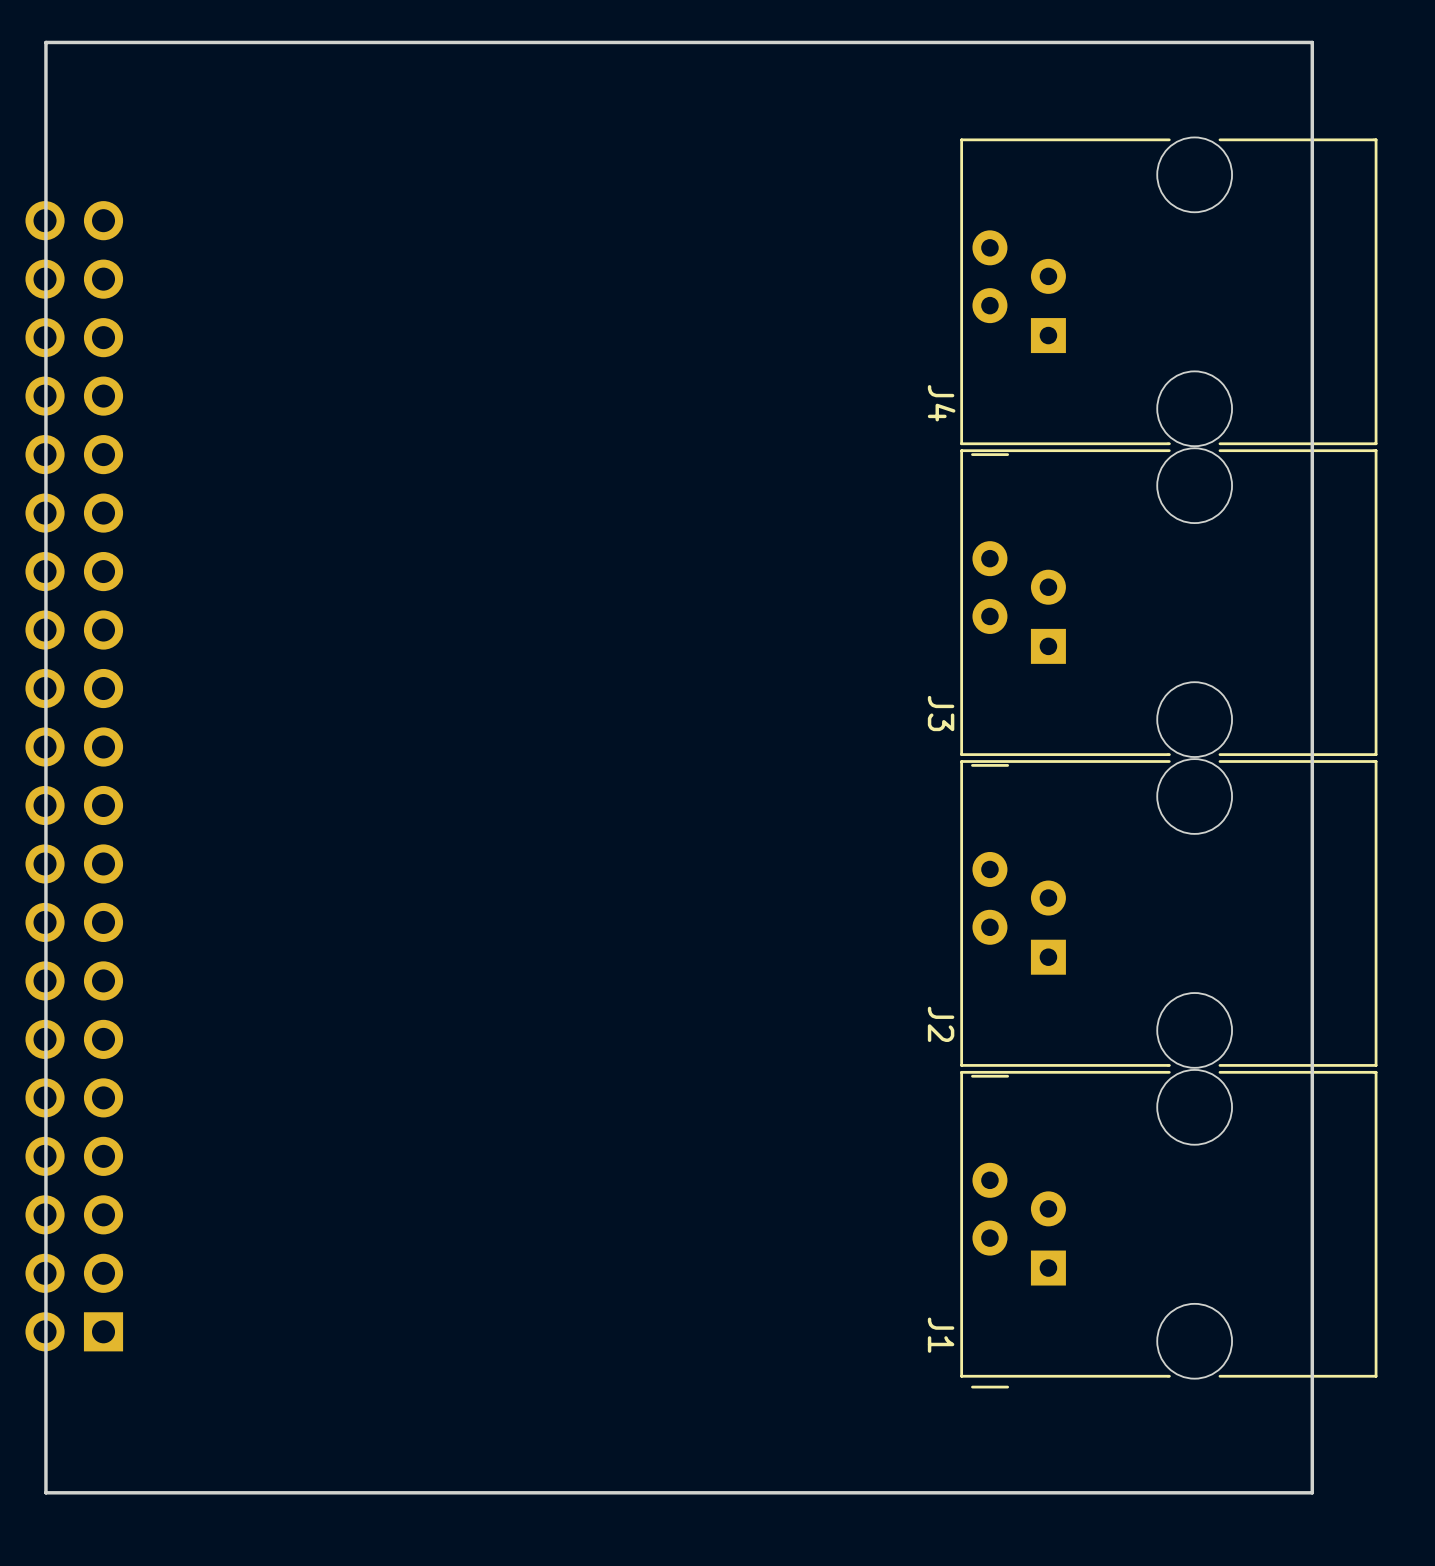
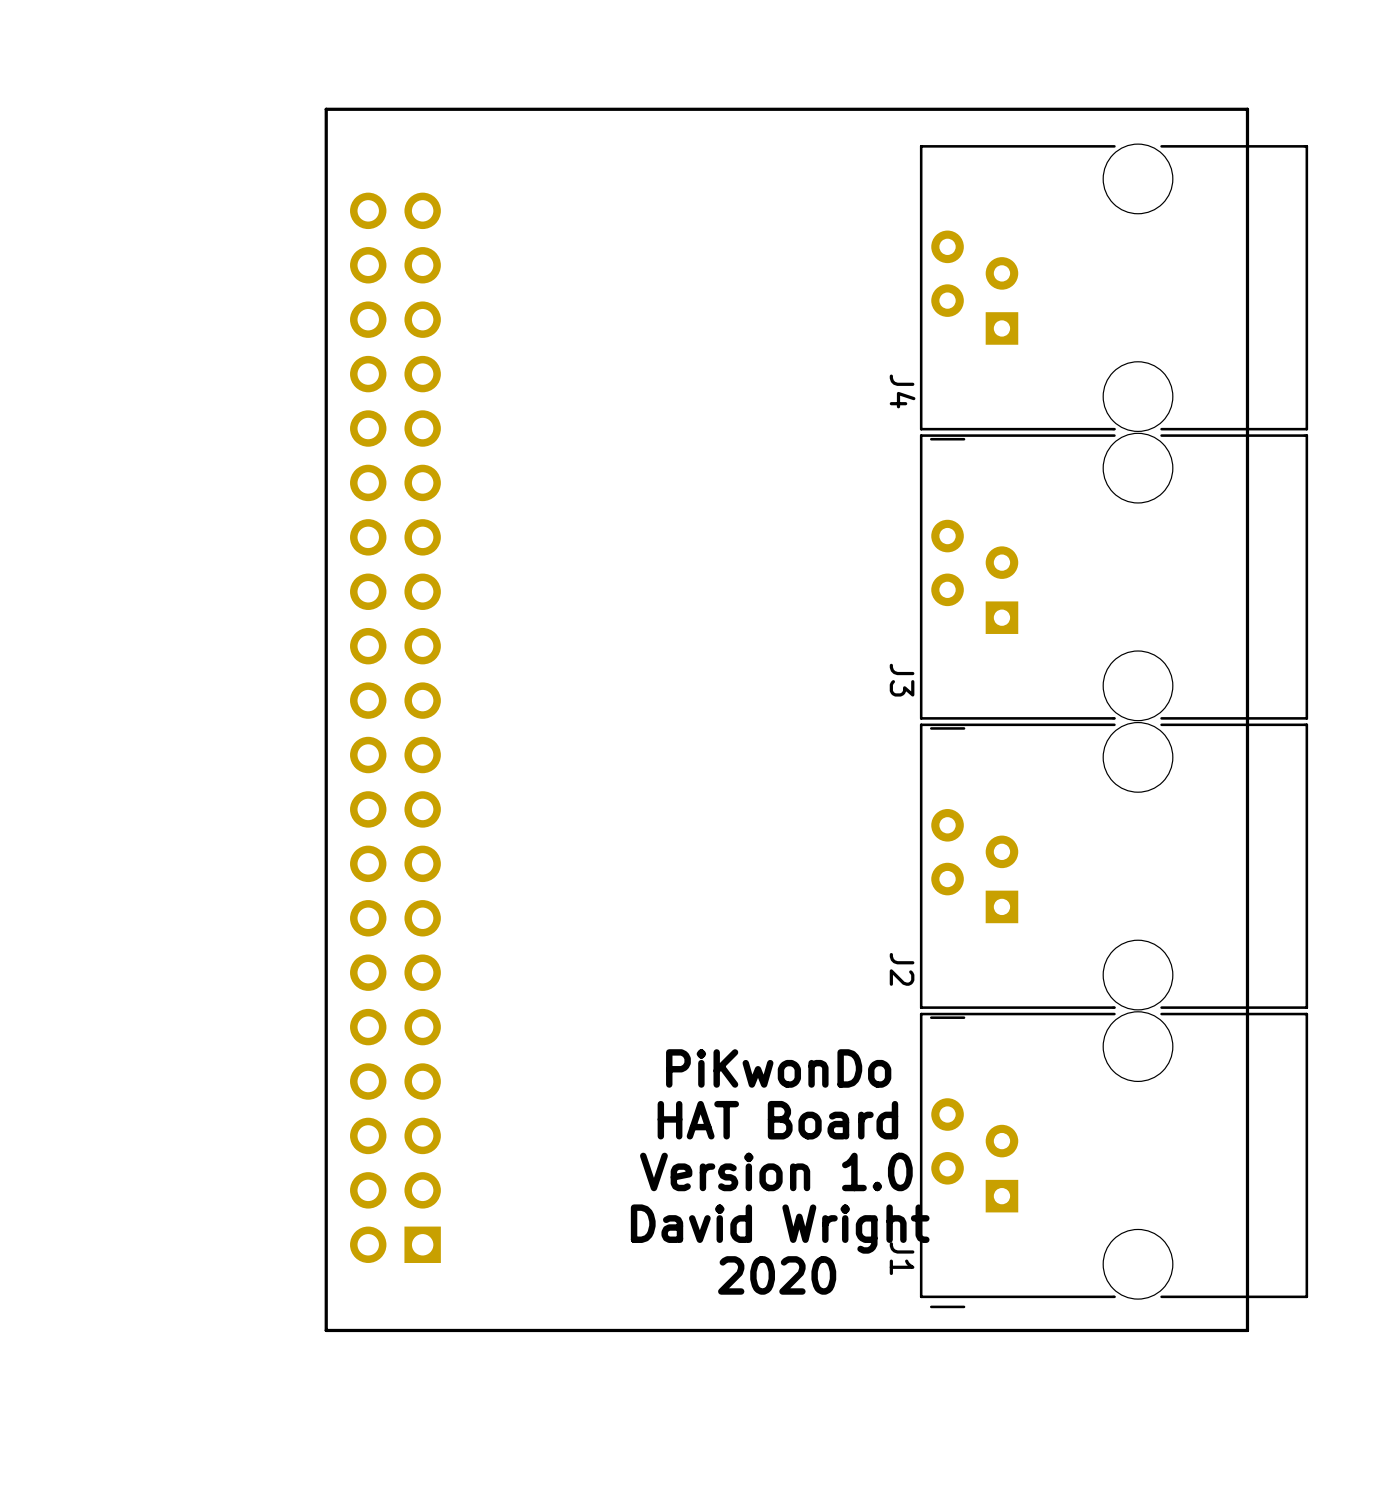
board edge: (1312, 100) (1312, 42) (45, 42) (45, 1492) (1312, 1492) (1312, 1412) -> (1247, 109) (326, 109) (326, 1330) (1247, 1330)
part position: (74, 776) -> (395, 727)
text: none -> PiKwonDo (778, 1068)
text: none -> HAT Board (777, 1120)
text: none -> Version 1.0 (776, 1171)
text: none -> David Wright (780, 1229)
text: none -> 2020 (777, 1275)

